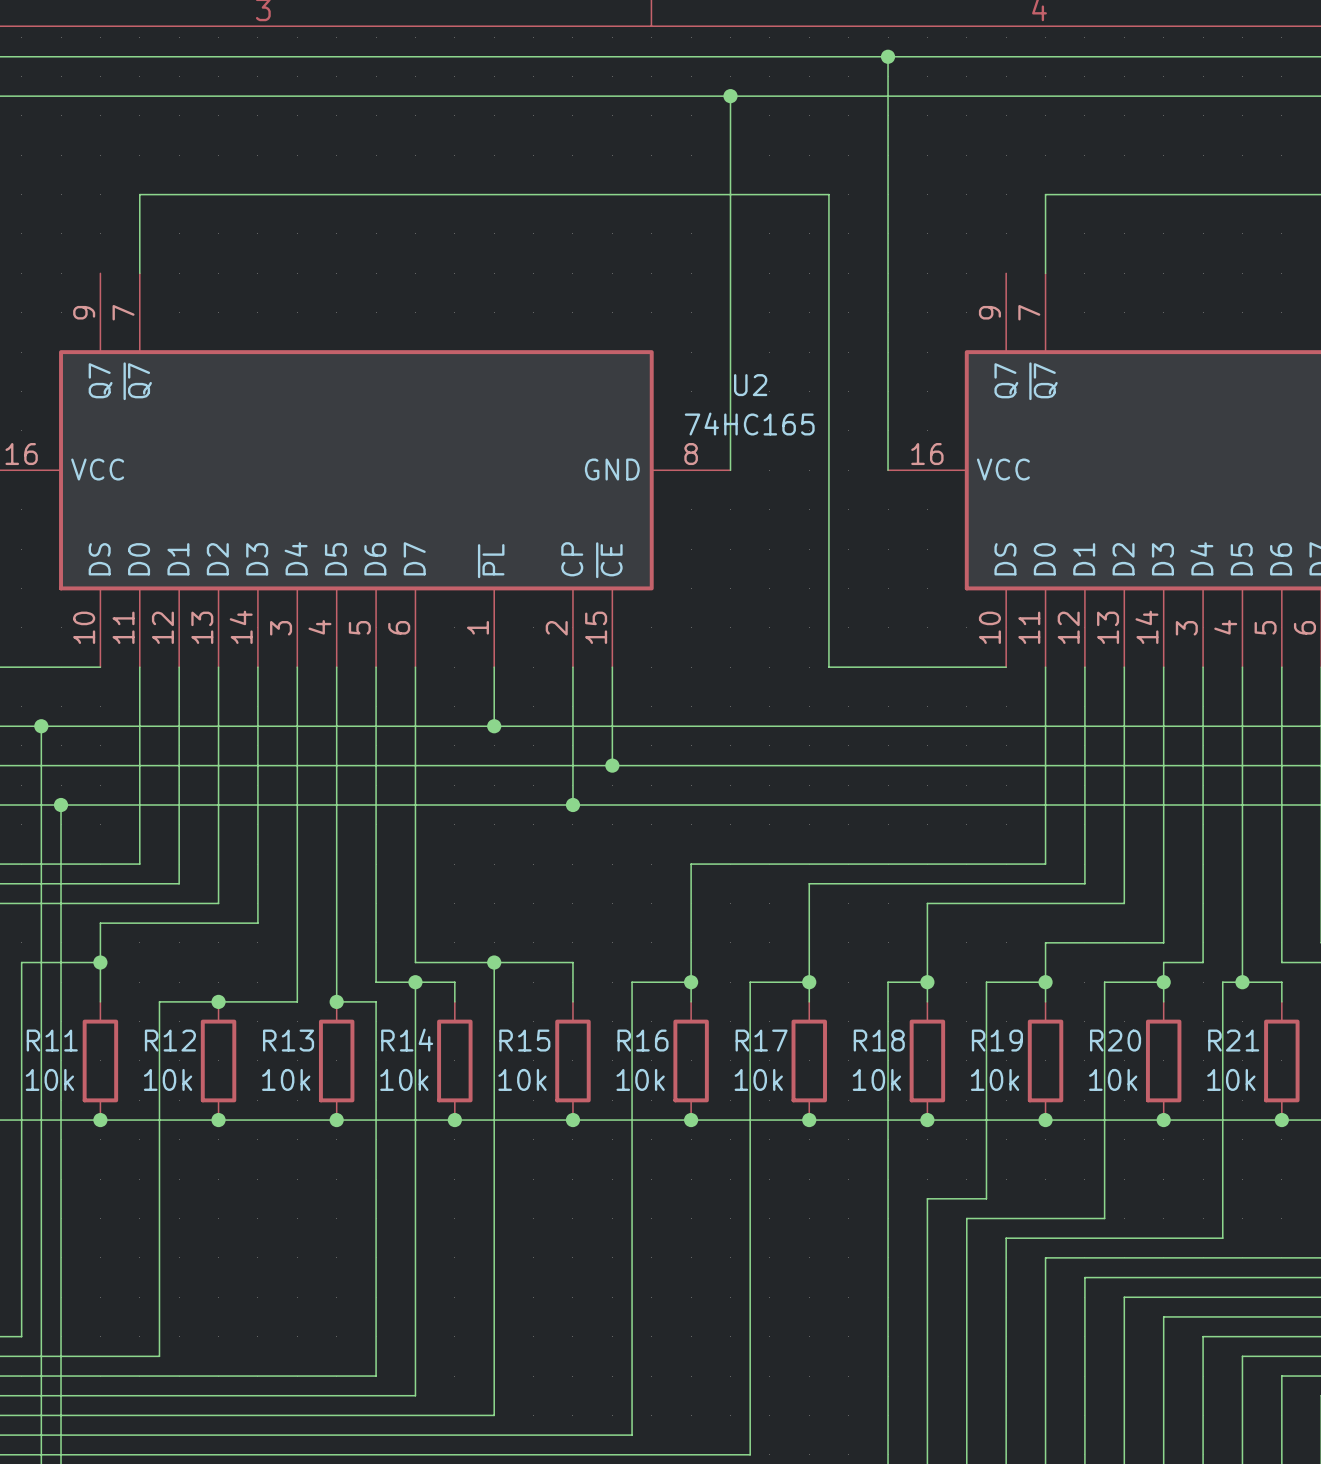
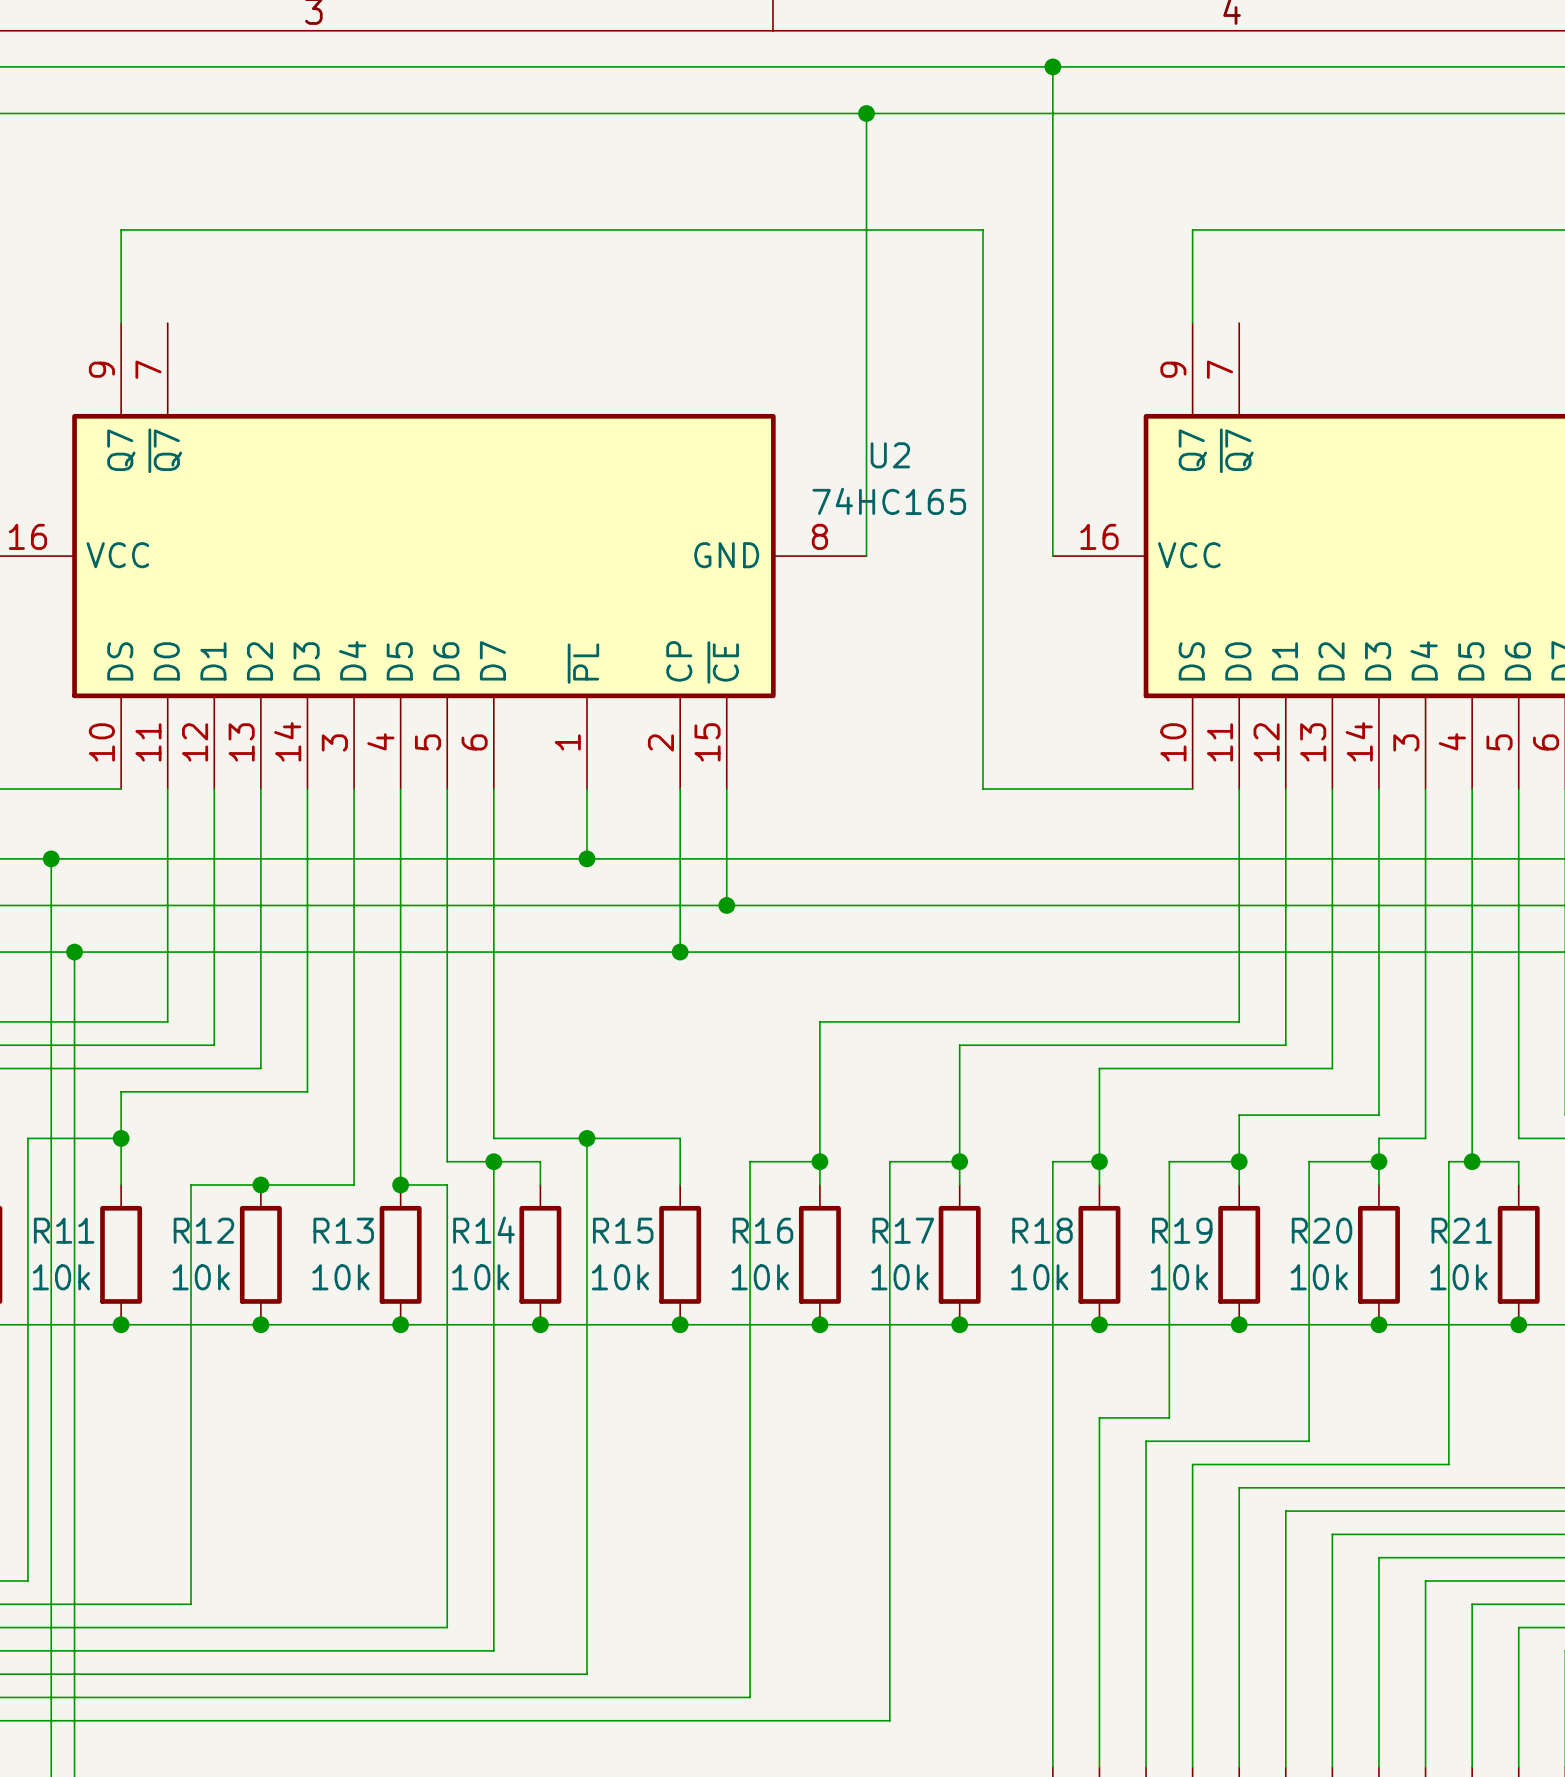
wire: (139, 194) (139, 273) -> (167, 229) (121, 229) (121, 323)
wire: (1045, 194) (1045, 273) -> (1239, 229) (1192, 229) (1192, 323)

